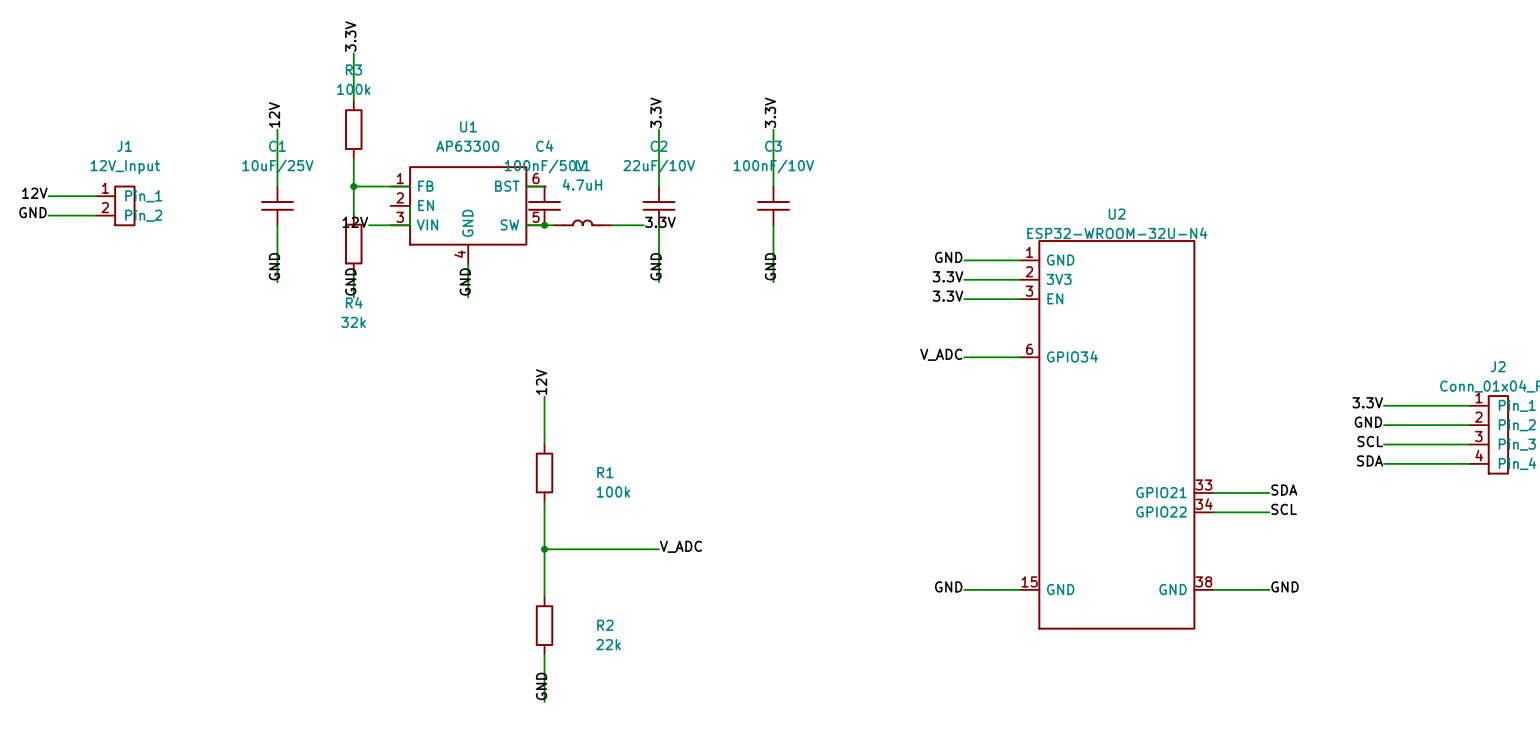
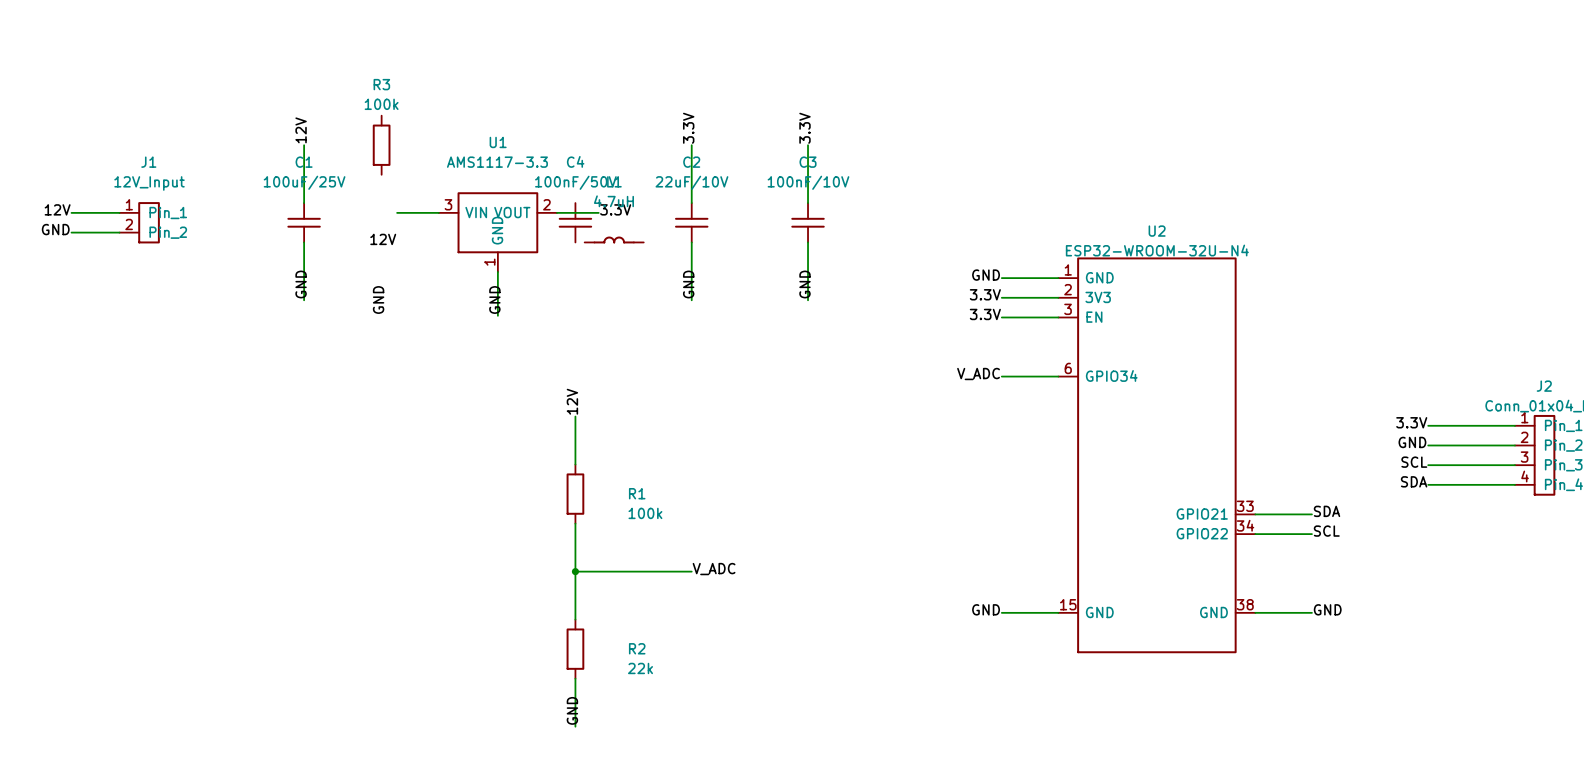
label: 3.3V (350, 36) -> none
wire: (353, 53) (353, 100) -> none
U1 value: AP63300 (467, 146) -> AMS1117-3.3 (497, 162)
wire: (353, 158) (353, 214) -> none
C1 value: 10uF/25V (277, 166) -> 100uF/25V (304, 182)
U1 symbol: [390, 166, 546, 265] -> [438, 192, 557, 272]
wire: (353, 186) (410, 186) -> none
junction: (353, 186) -> none
wire: (526, 186) (544, 186) -> none
wire: none -> (397, 212) (438, 212)
wire: none -> (556, 212) (598, 212)
wire: (410, 205) (410, 225) (369, 225) -> none
label position: 3.3V (660, 222) -> 3.3V (615, 209)
wire: (526, 225) (553, 225) -> none
junction: (544, 225) -> none
wire: (611, 225) (643, 225) -> none
R4: 32k (353, 244) -> none
wire: (353, 273) (353, 297) -> none

